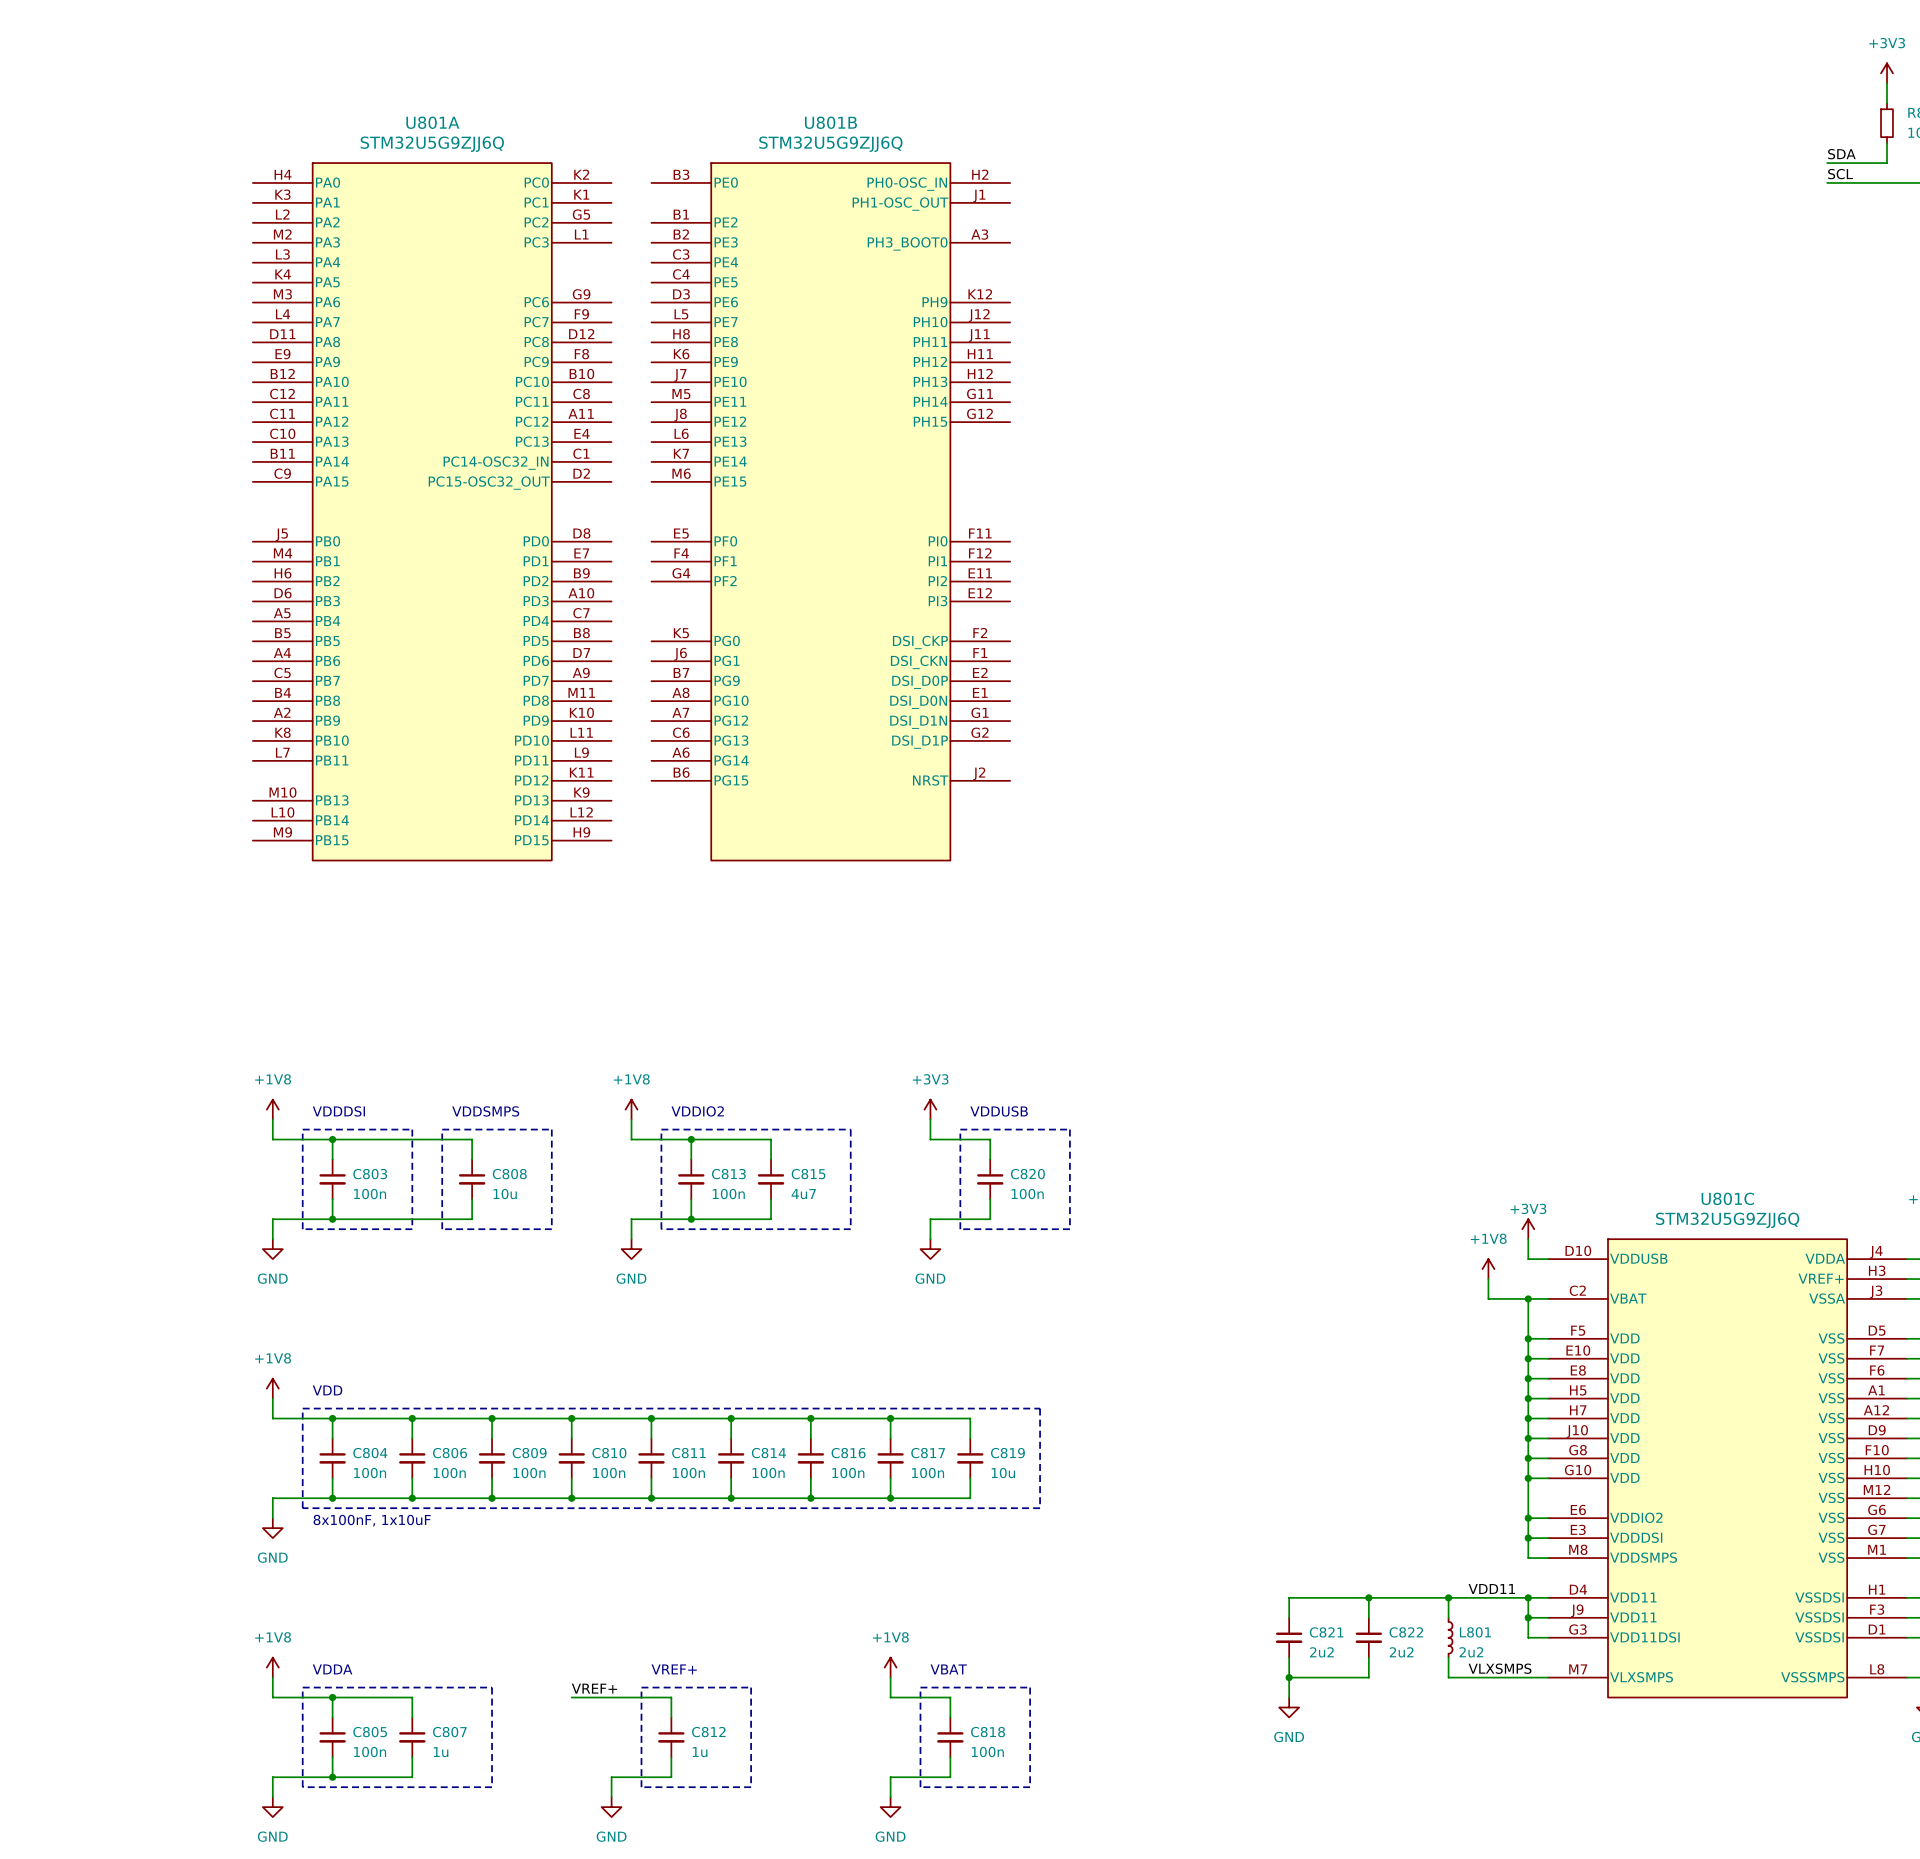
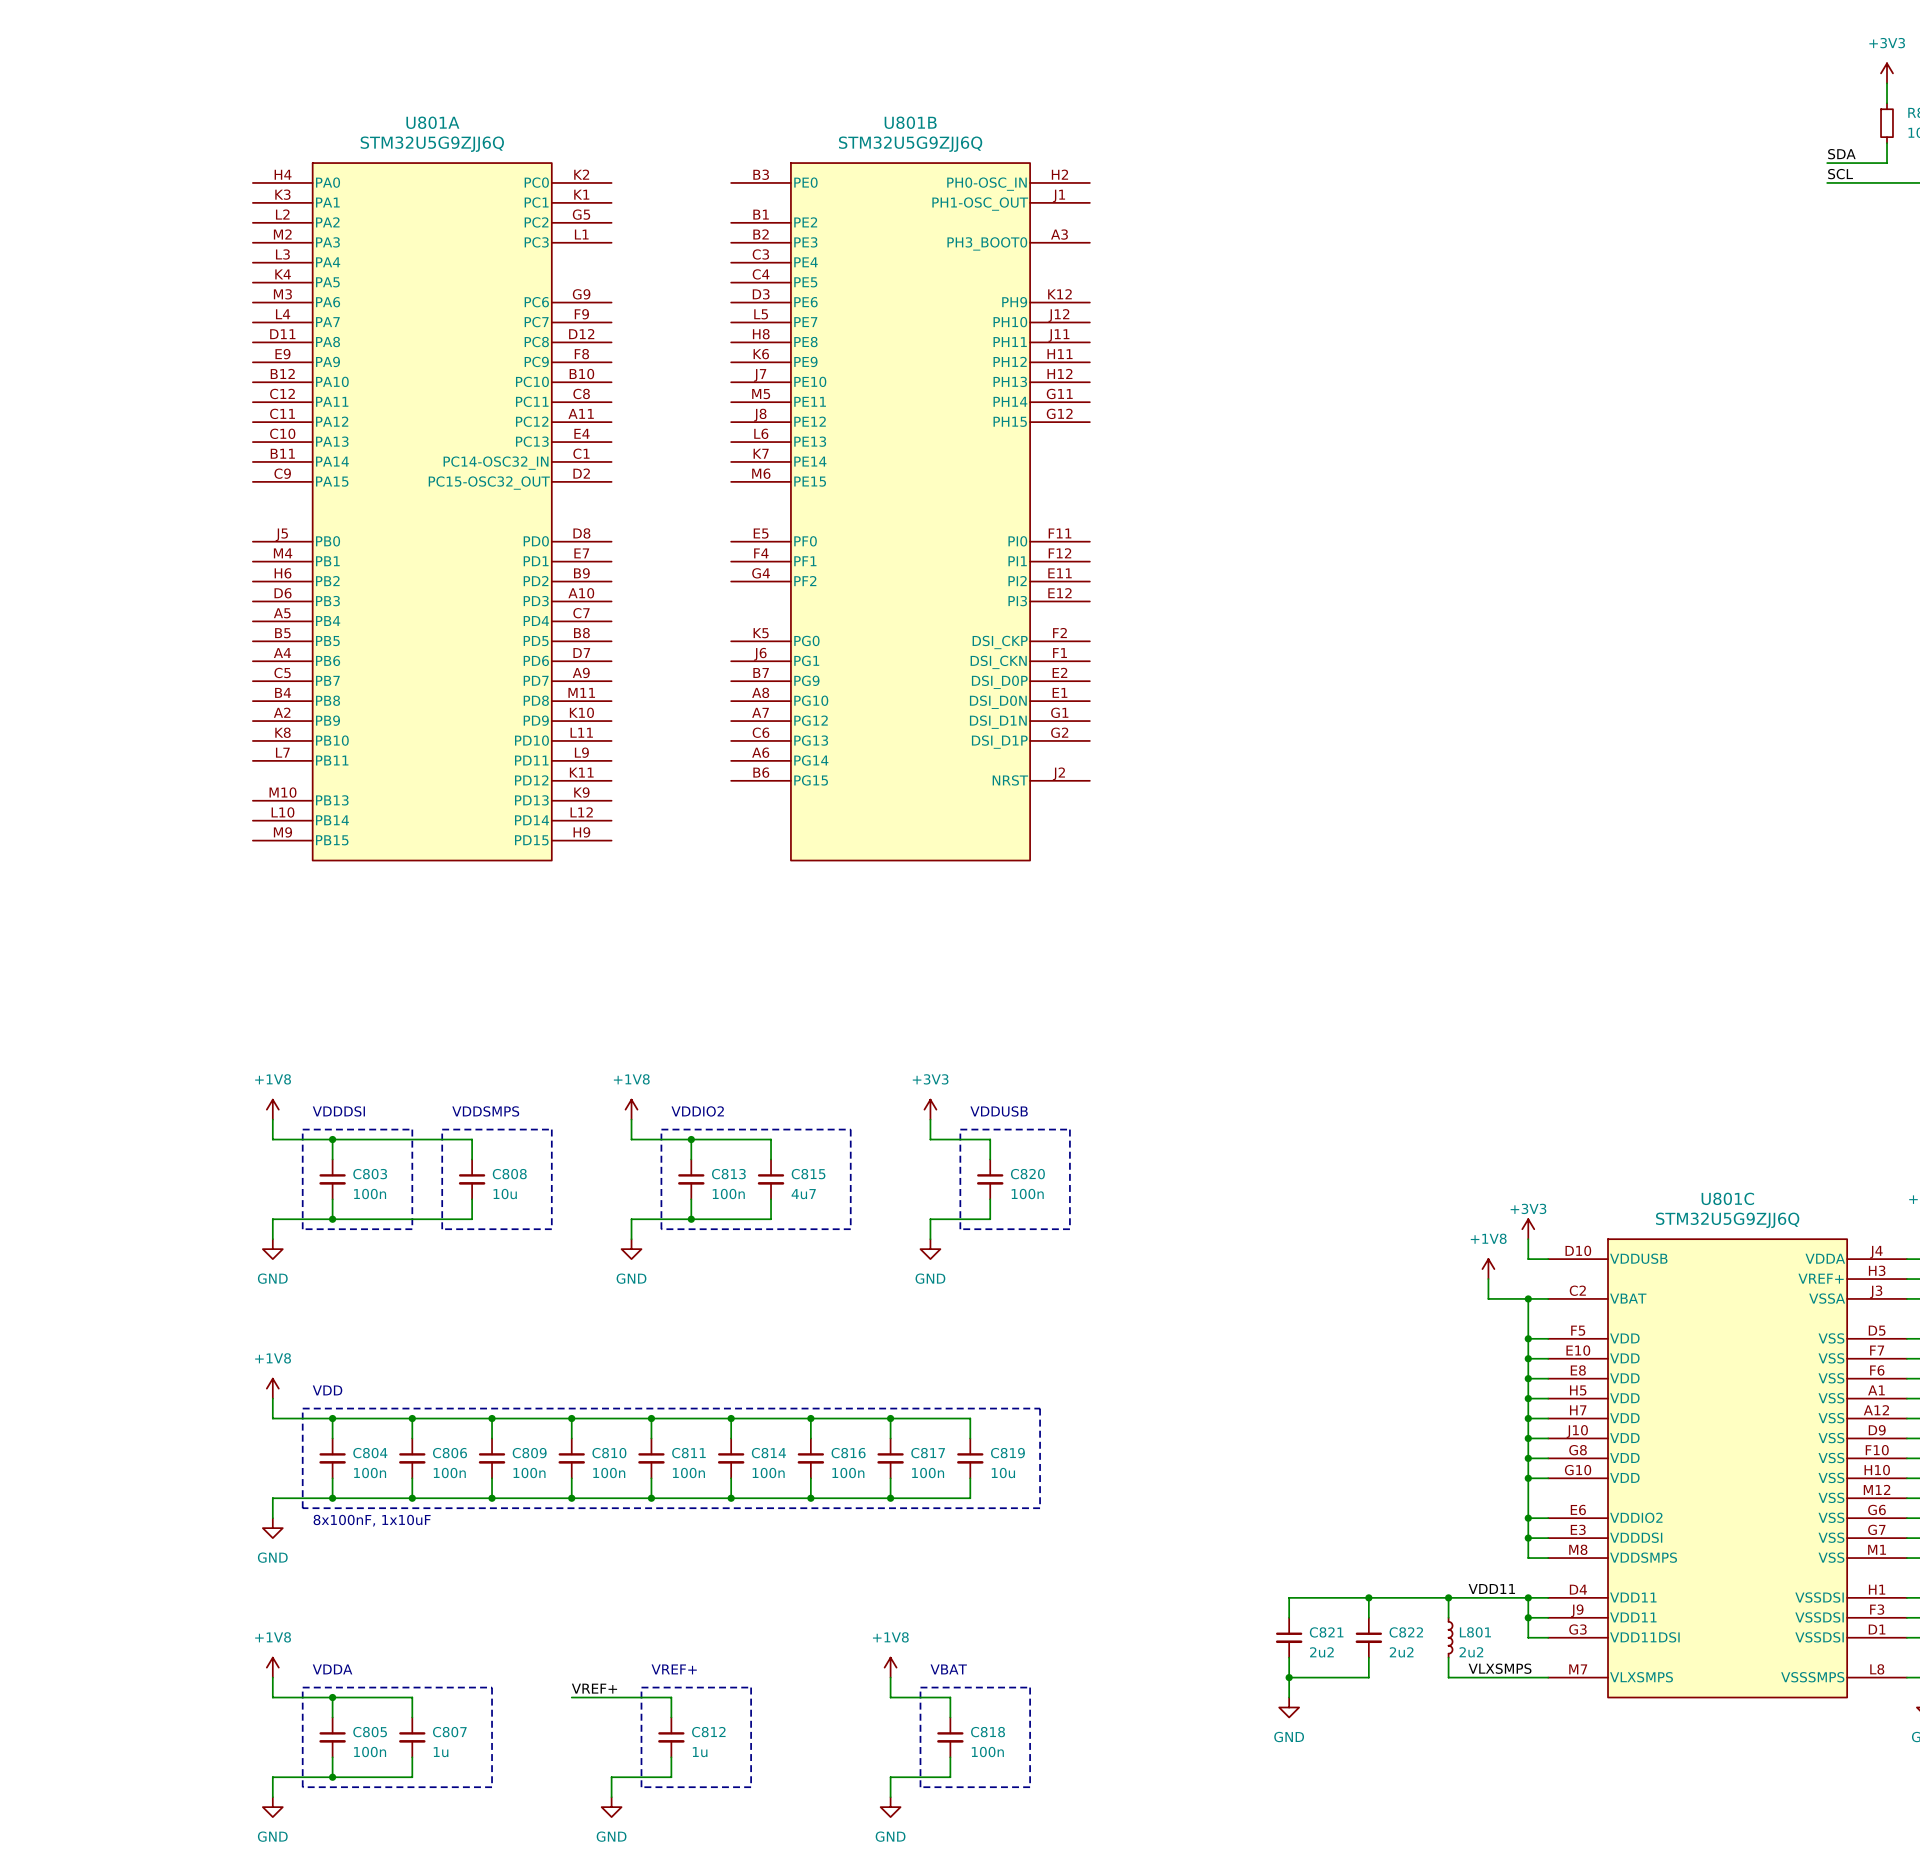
U801B position: (830, 511) -> (910, 511)

